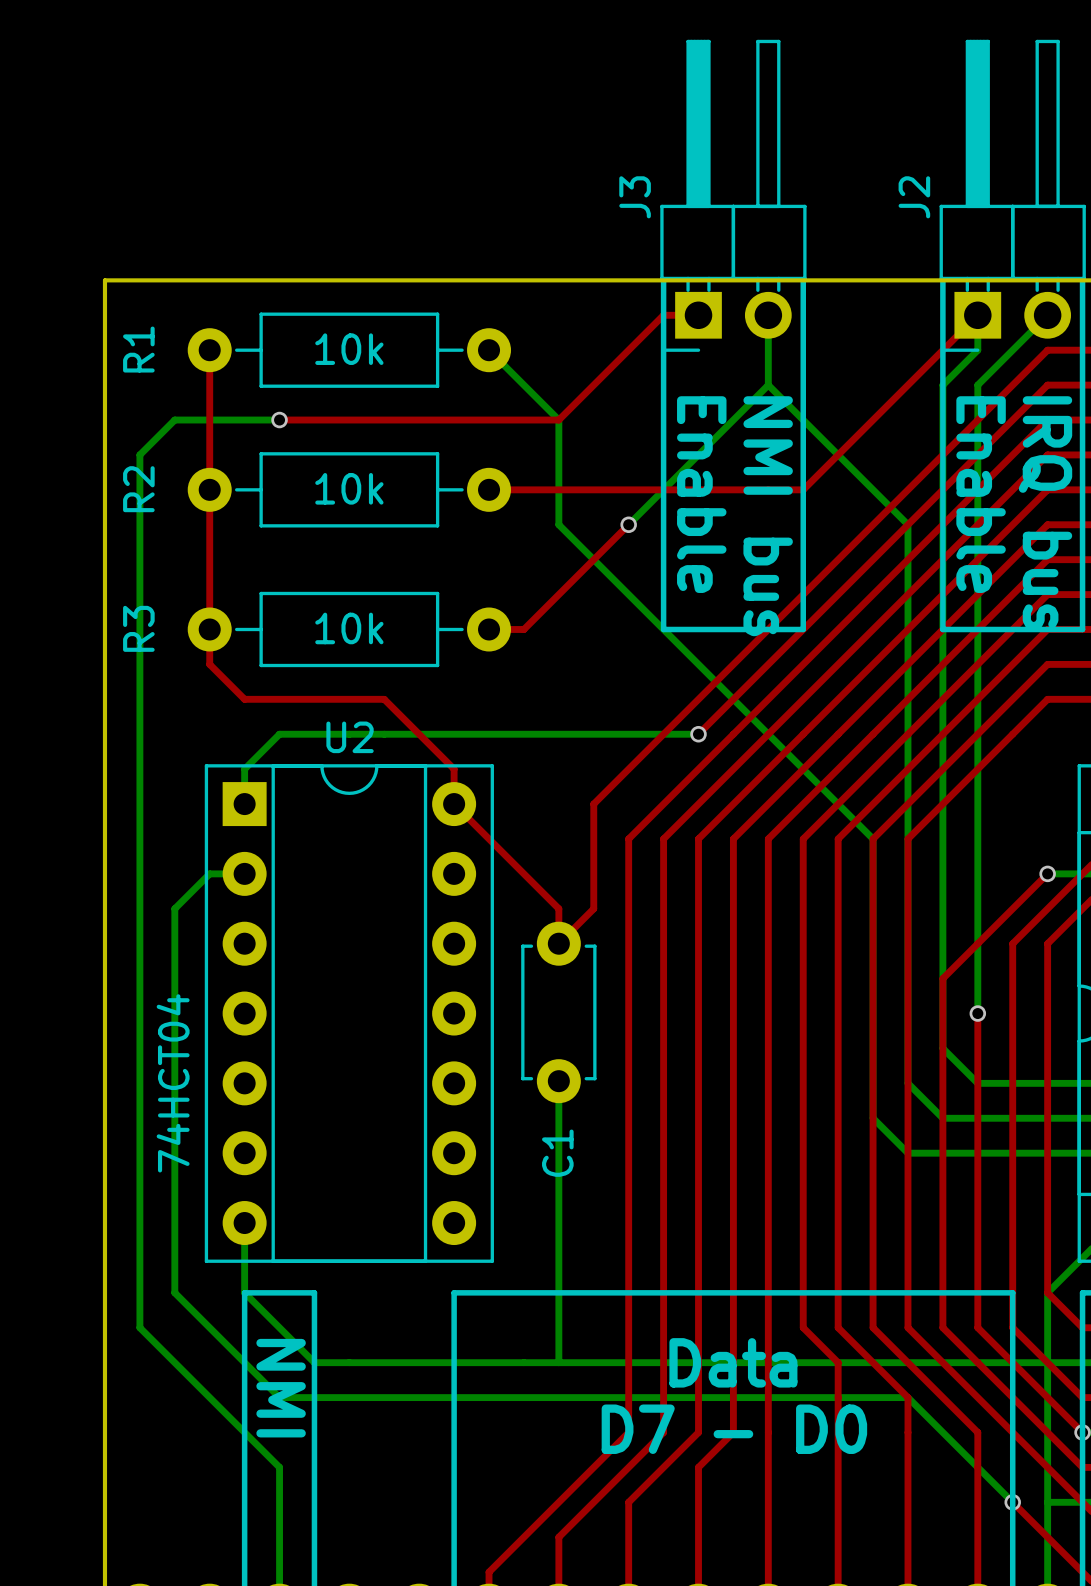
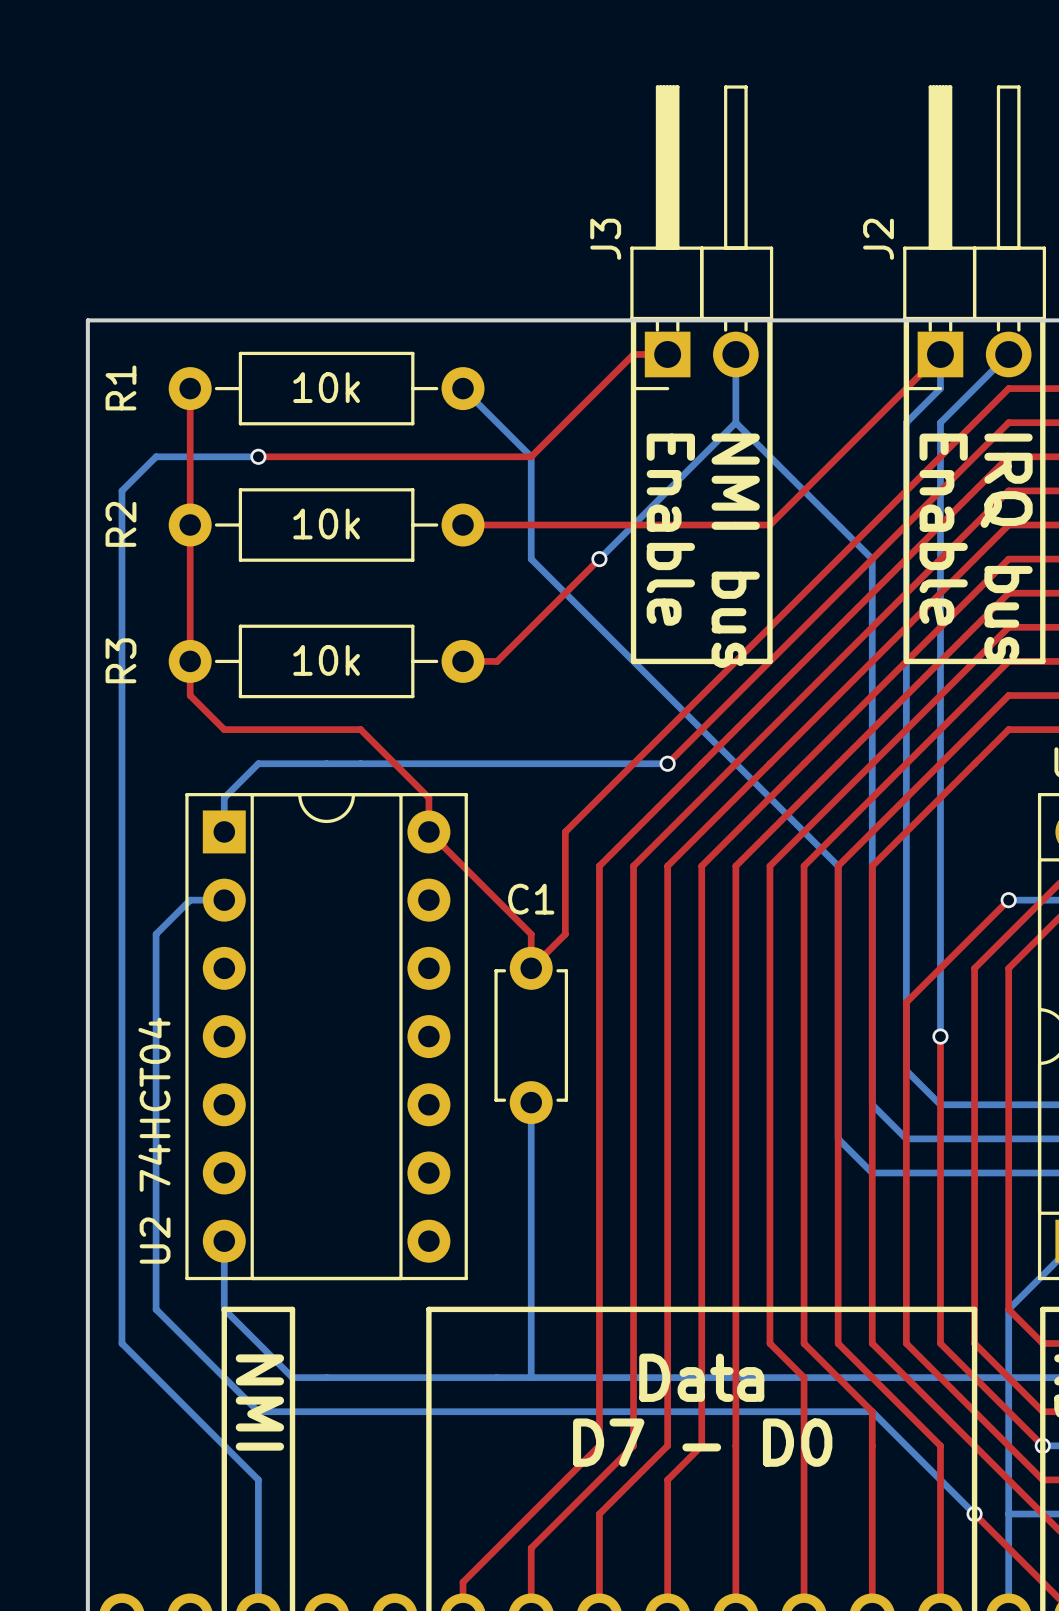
U2 name rotation: 0° (350, 737) -> 90° counterclockwise (155, 1240)
U2 name position: U2 (350, 737) -> U2 (155, 1240)
C1 name rotation: 0° (557, 1153) -> 90° clockwise (531, 899)
C1 name position: C1 (557, 1153) -> C1 (531, 899)

